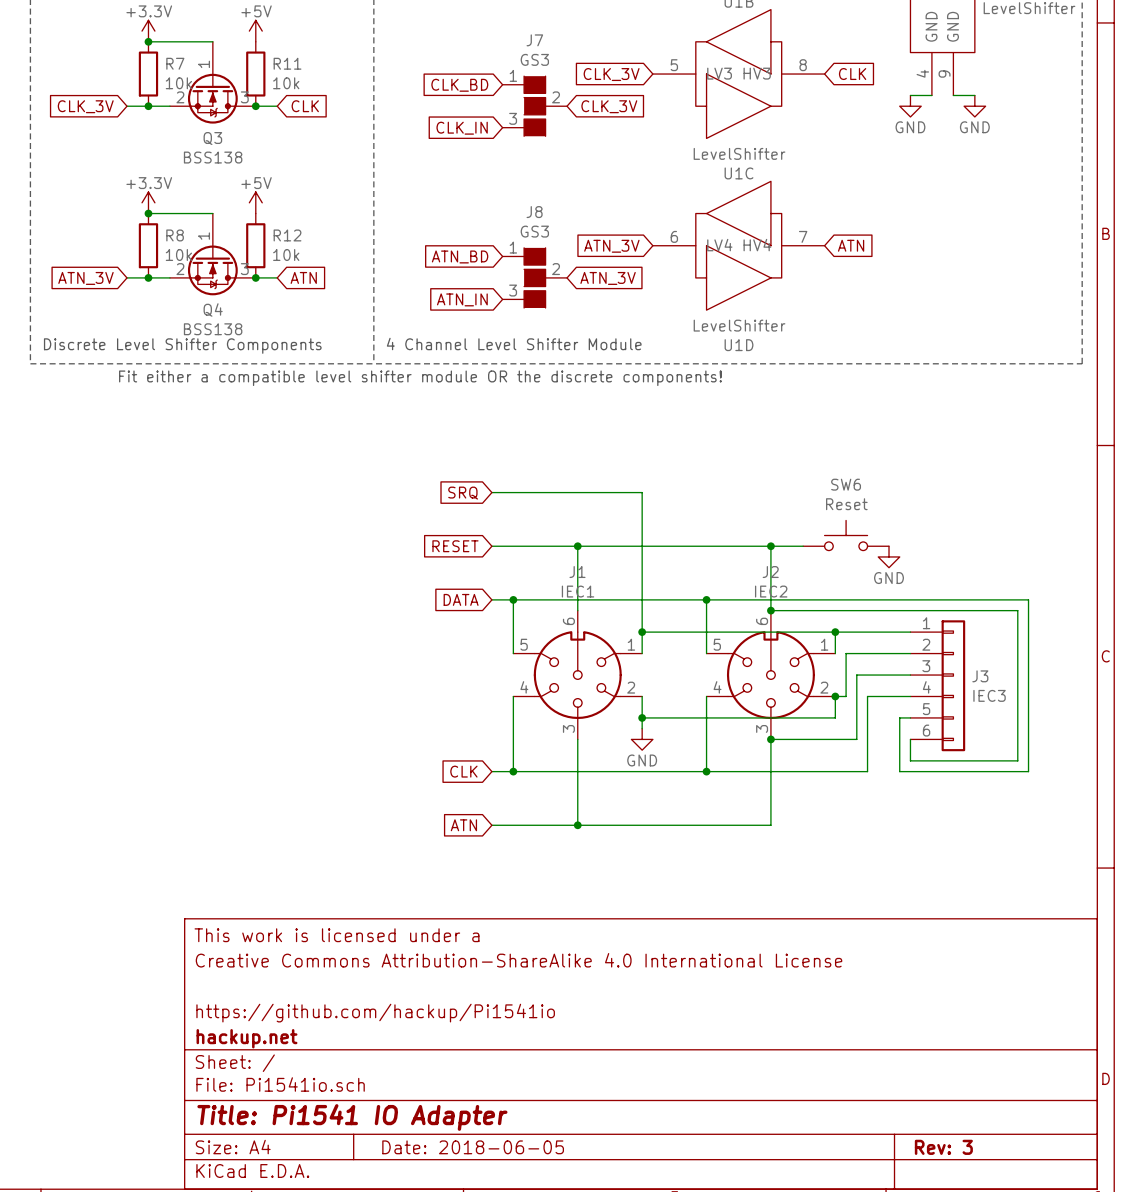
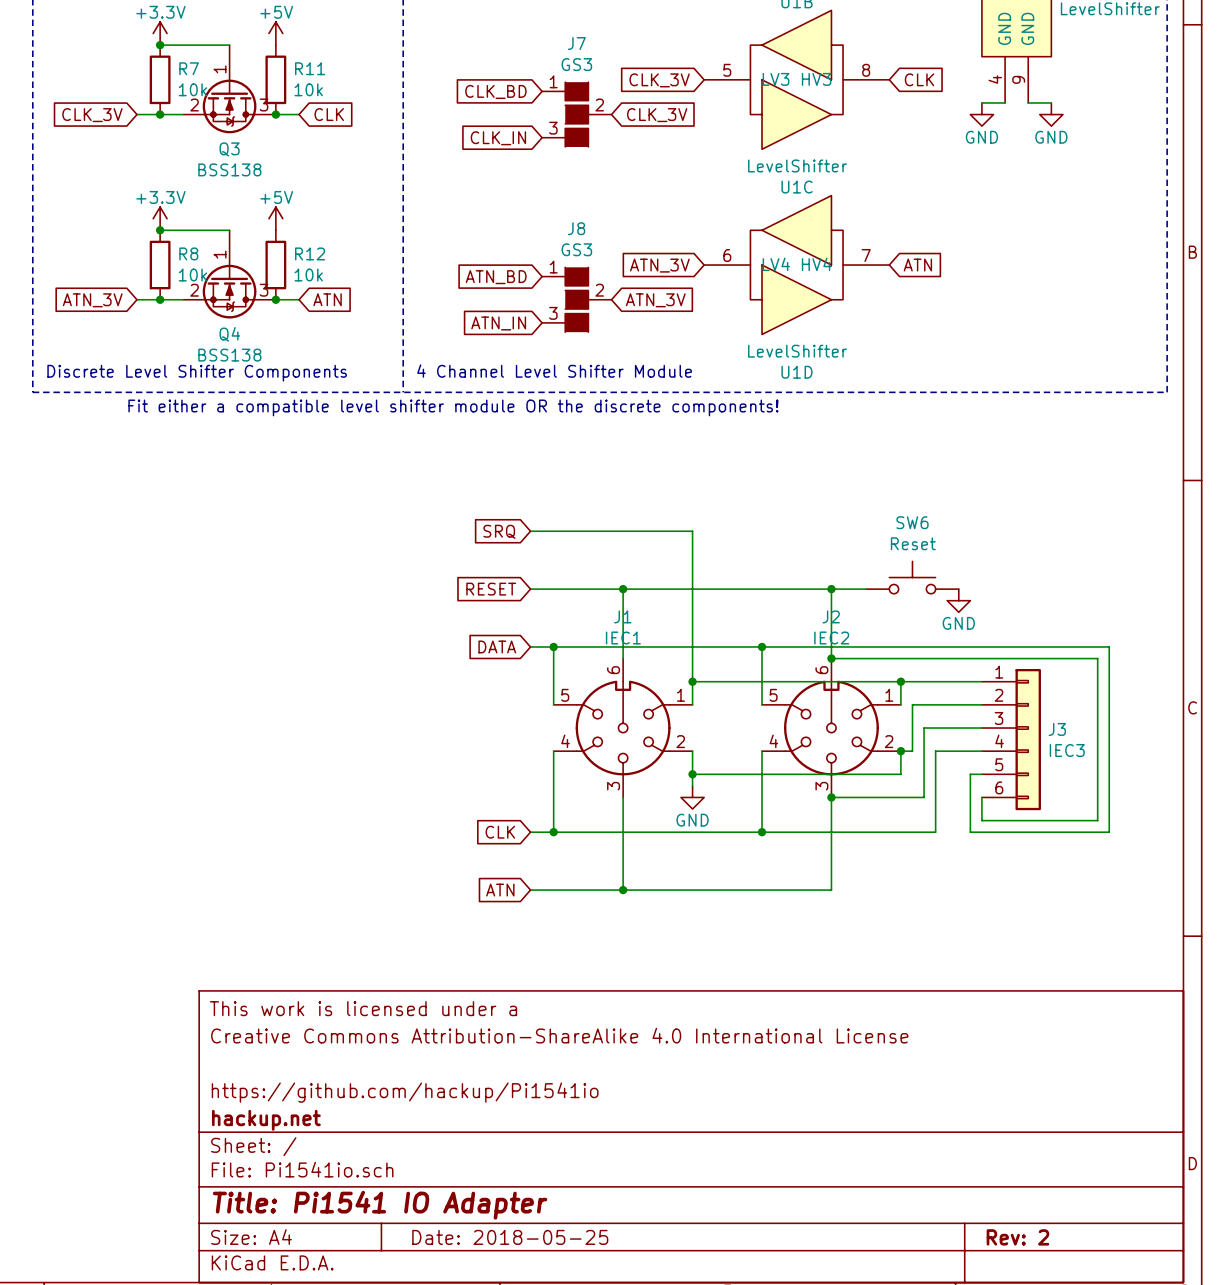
title block: Date: 2018-06-05 (473, 1147) -> Date: 2018-05-25 (510, 1237)
title block: Rev: 3 (943, 1147) -> Rev: 2 (1017, 1237)

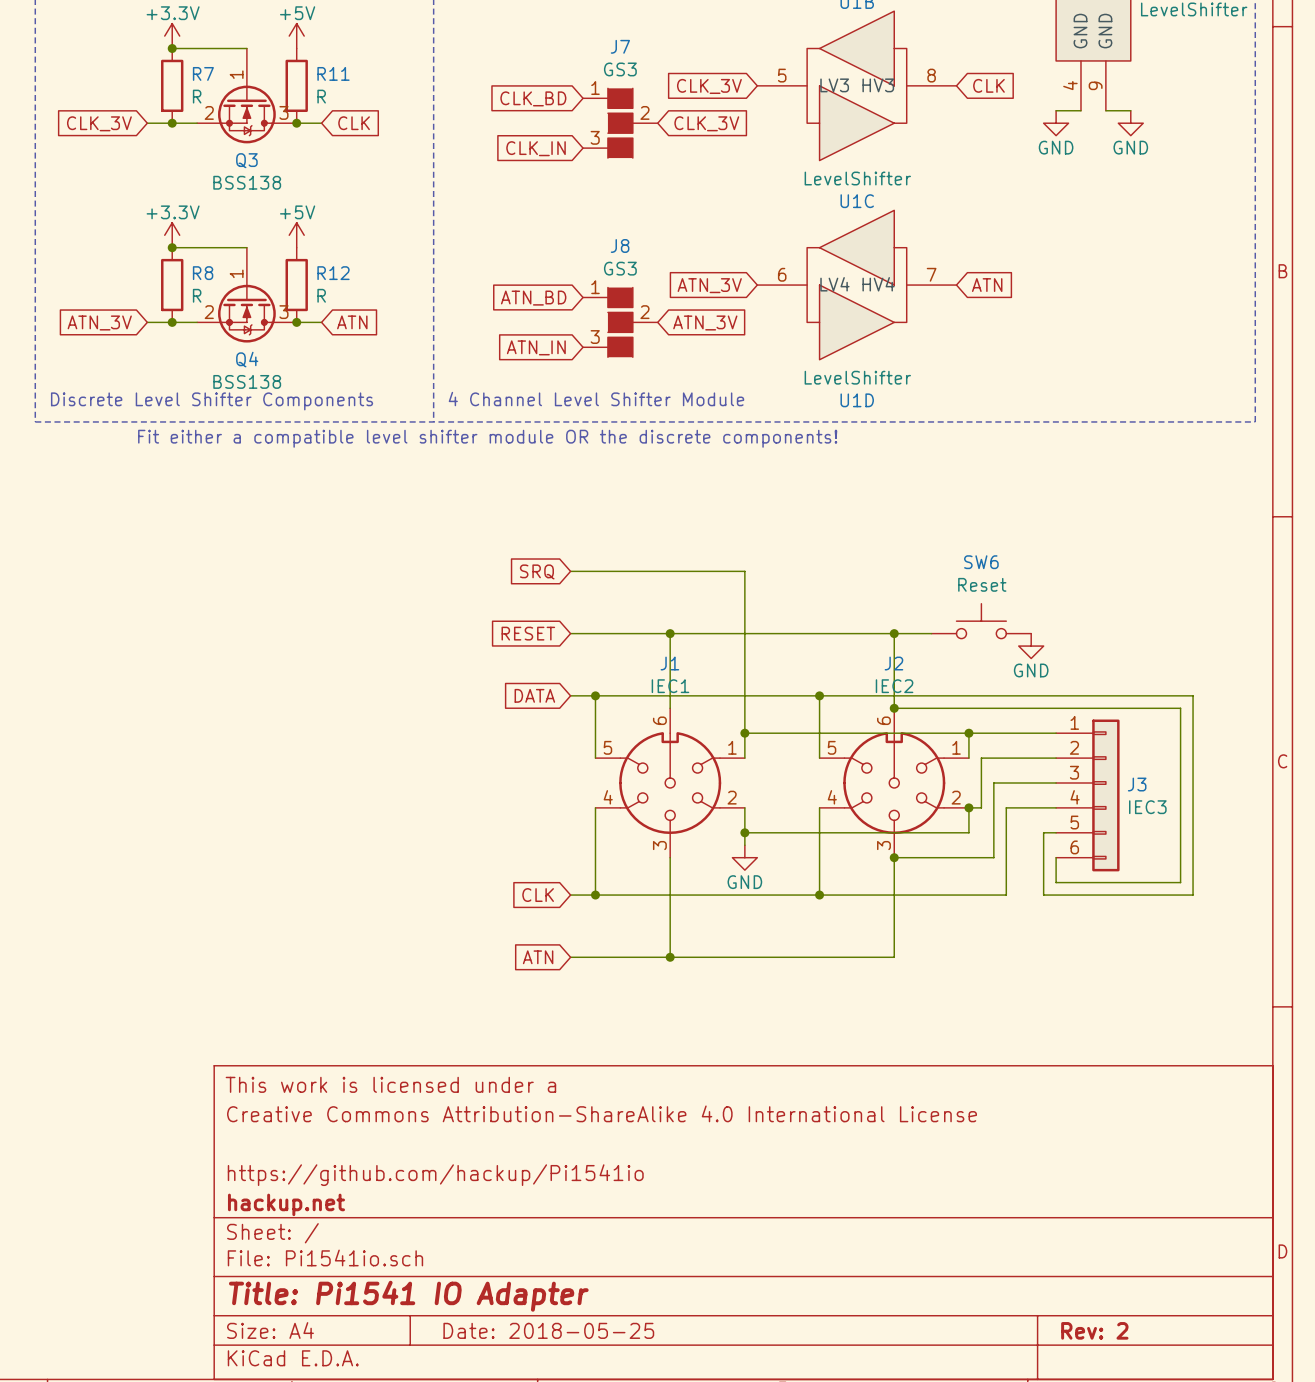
R7 value: 10k (192, 89) -> R (197, 96)
R11 value: 10k (308, 89) -> R (321, 96)
R8 value: 10k (192, 275) -> R (197, 295)
R12 value: 10k (308, 275) -> R (321, 295)

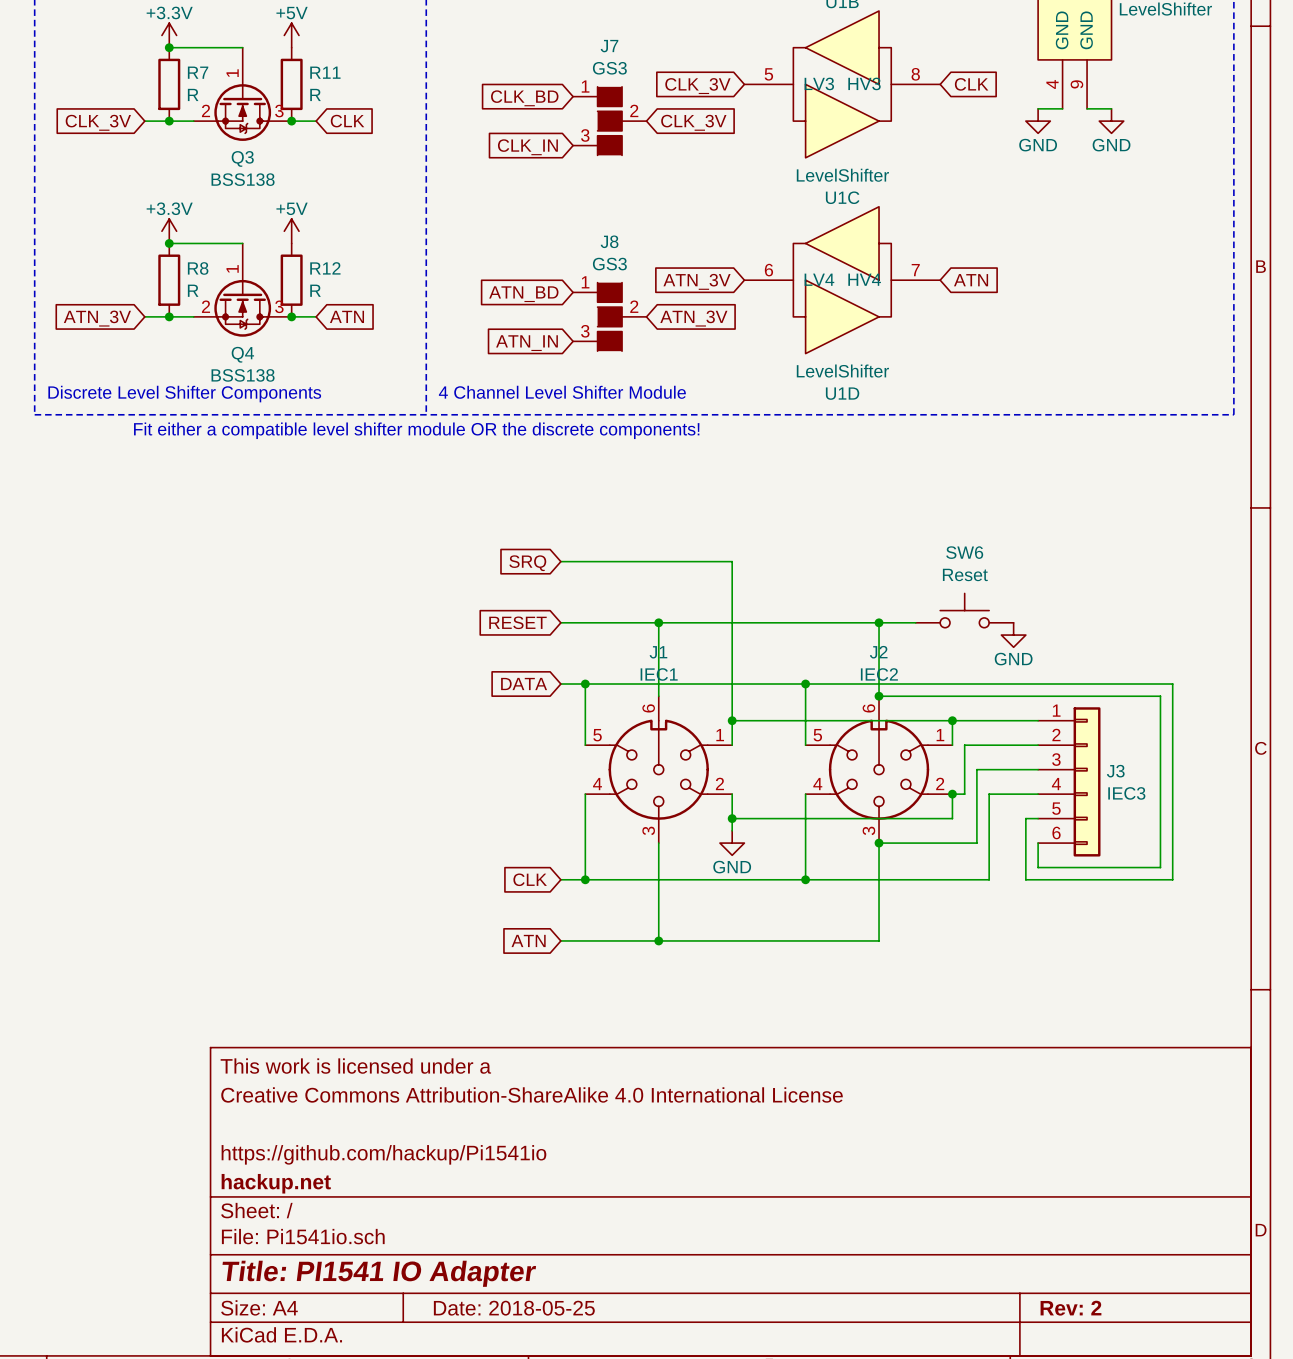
title block: Title: Pi1541 IO Adapter (408, 1296) -> Title: PI1541 IO Adapter (379, 1273)

